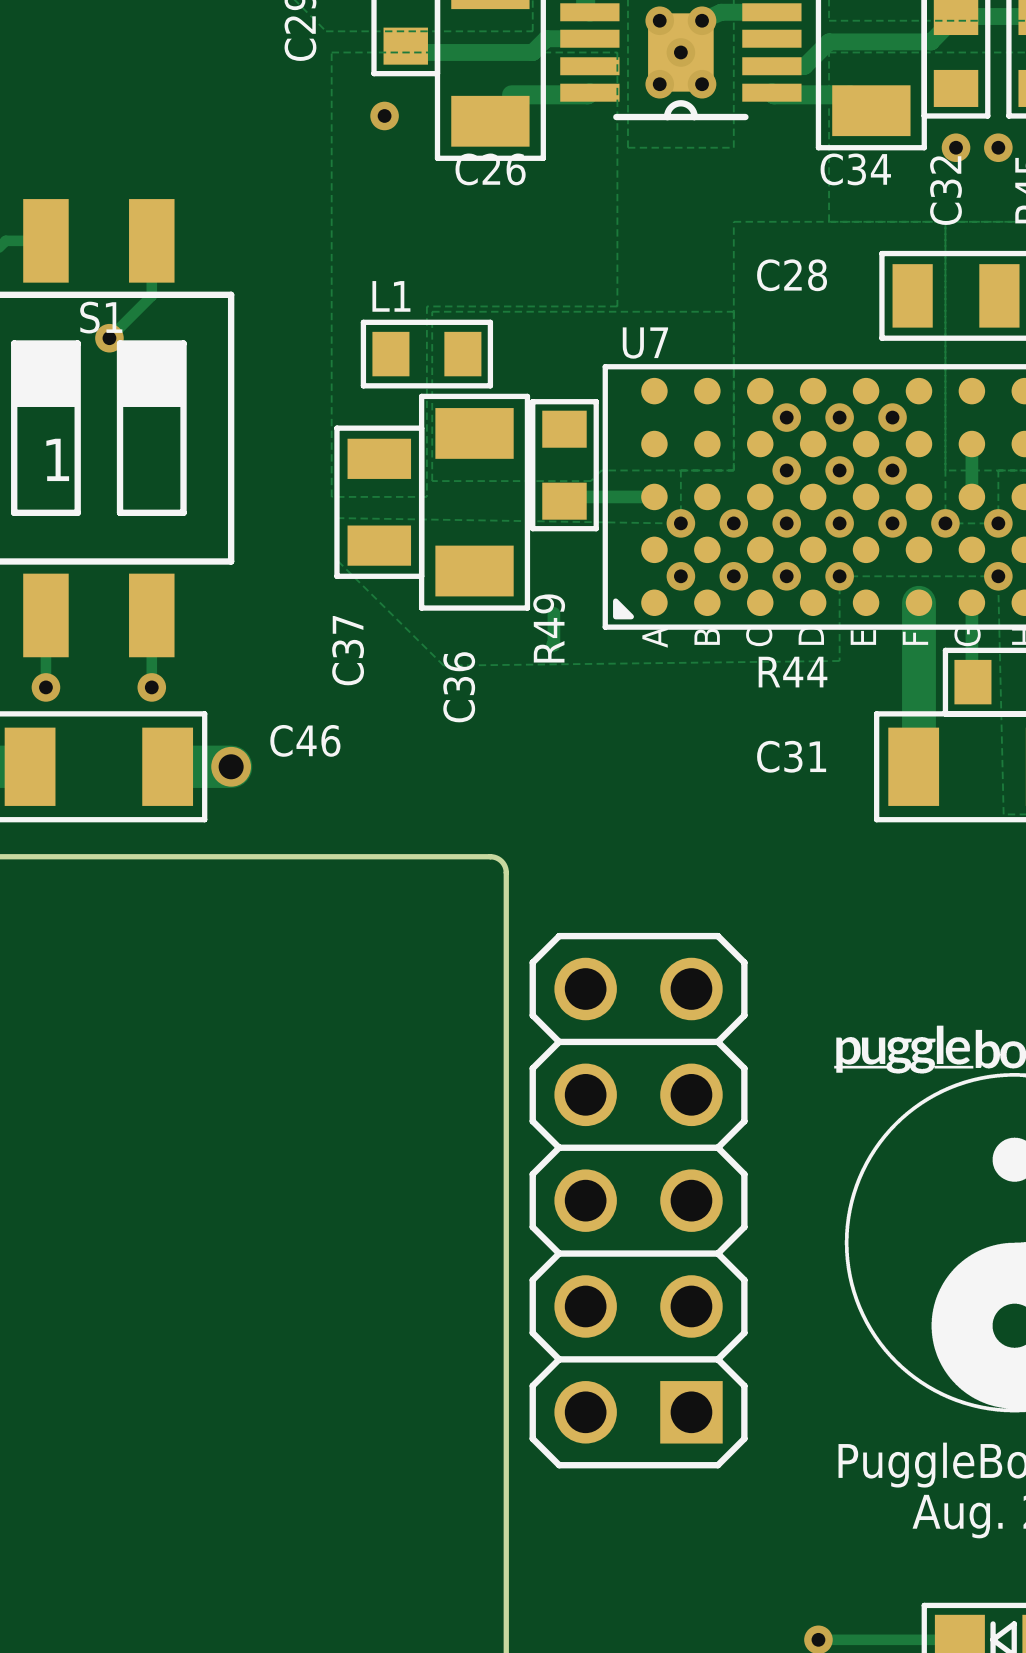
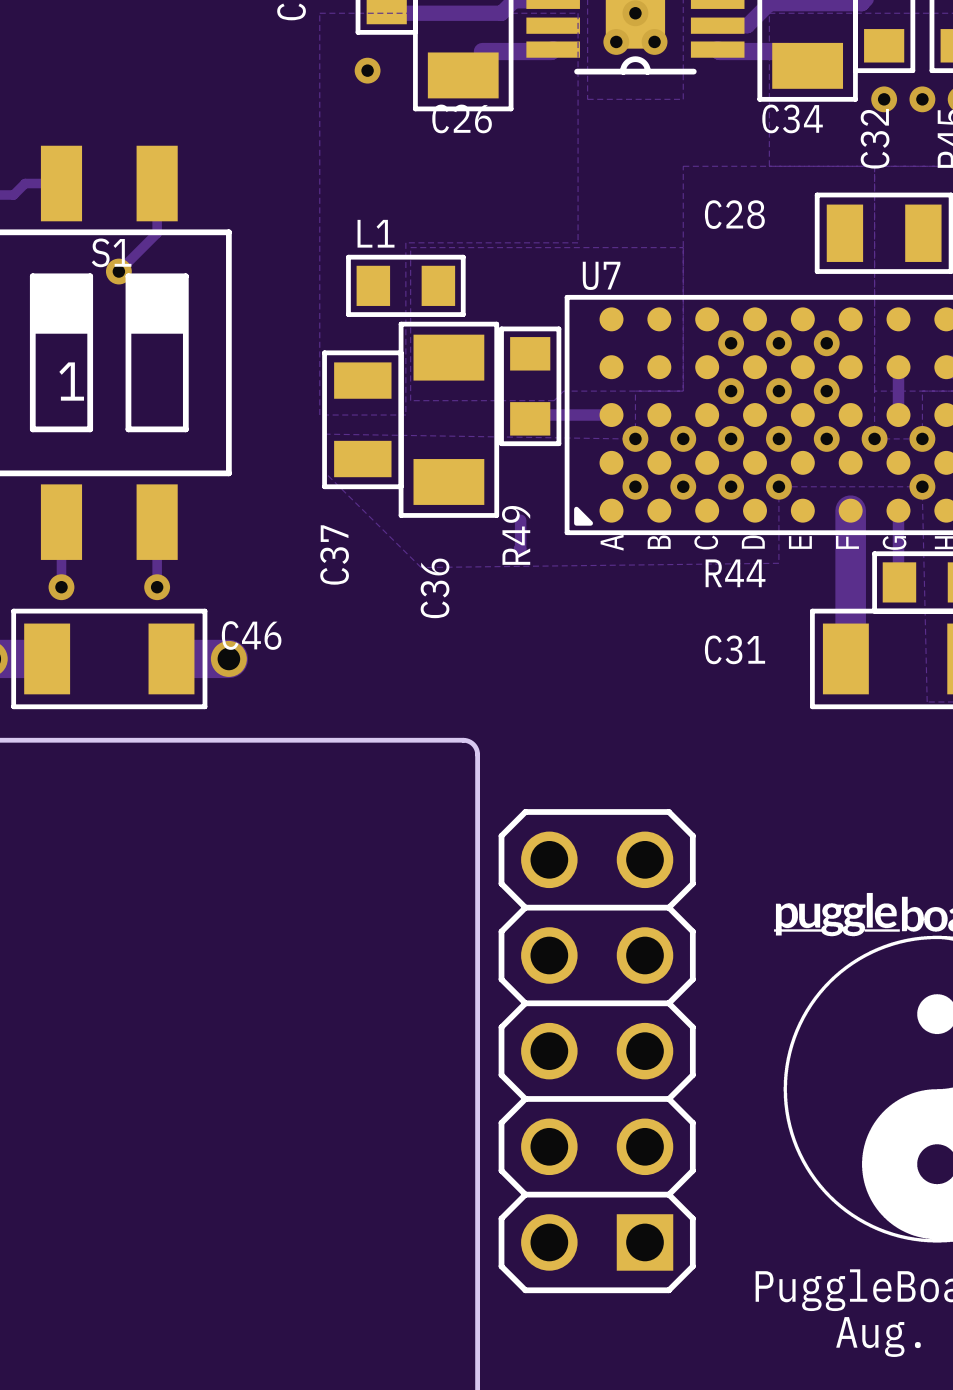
C46 name position: C46 (305, 740) -> C46 (251, 635)

